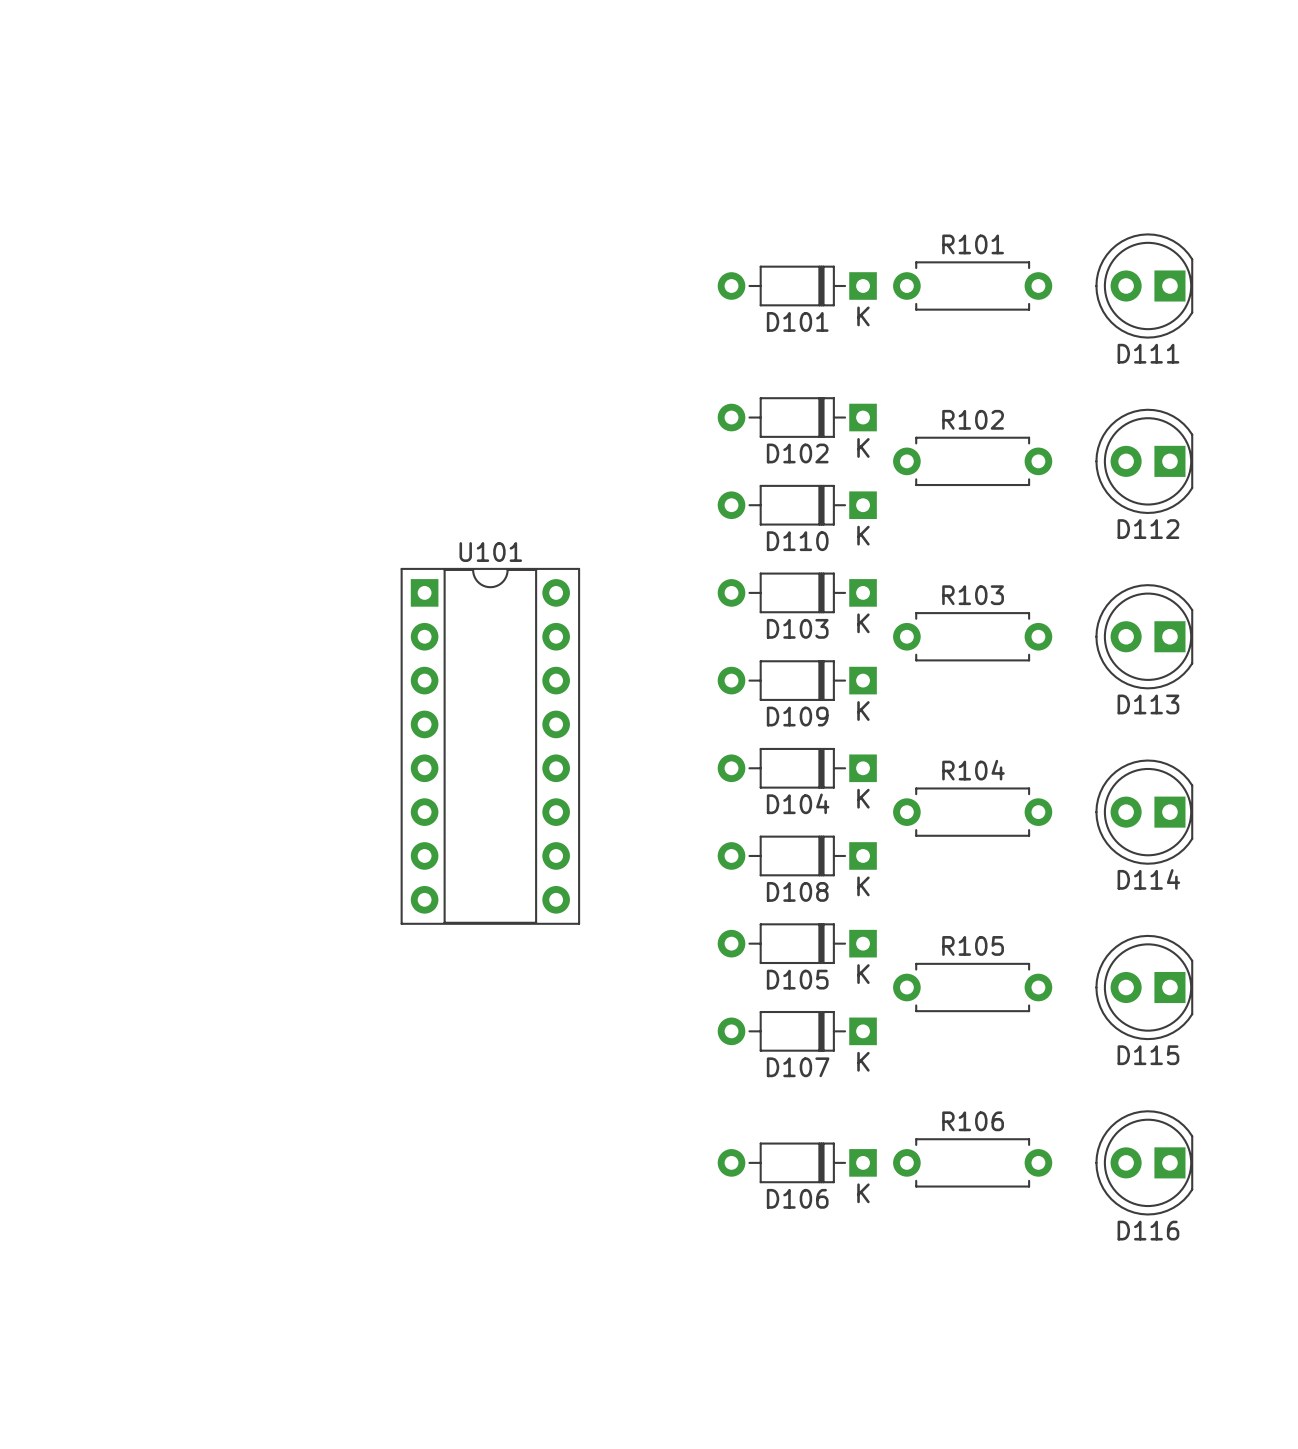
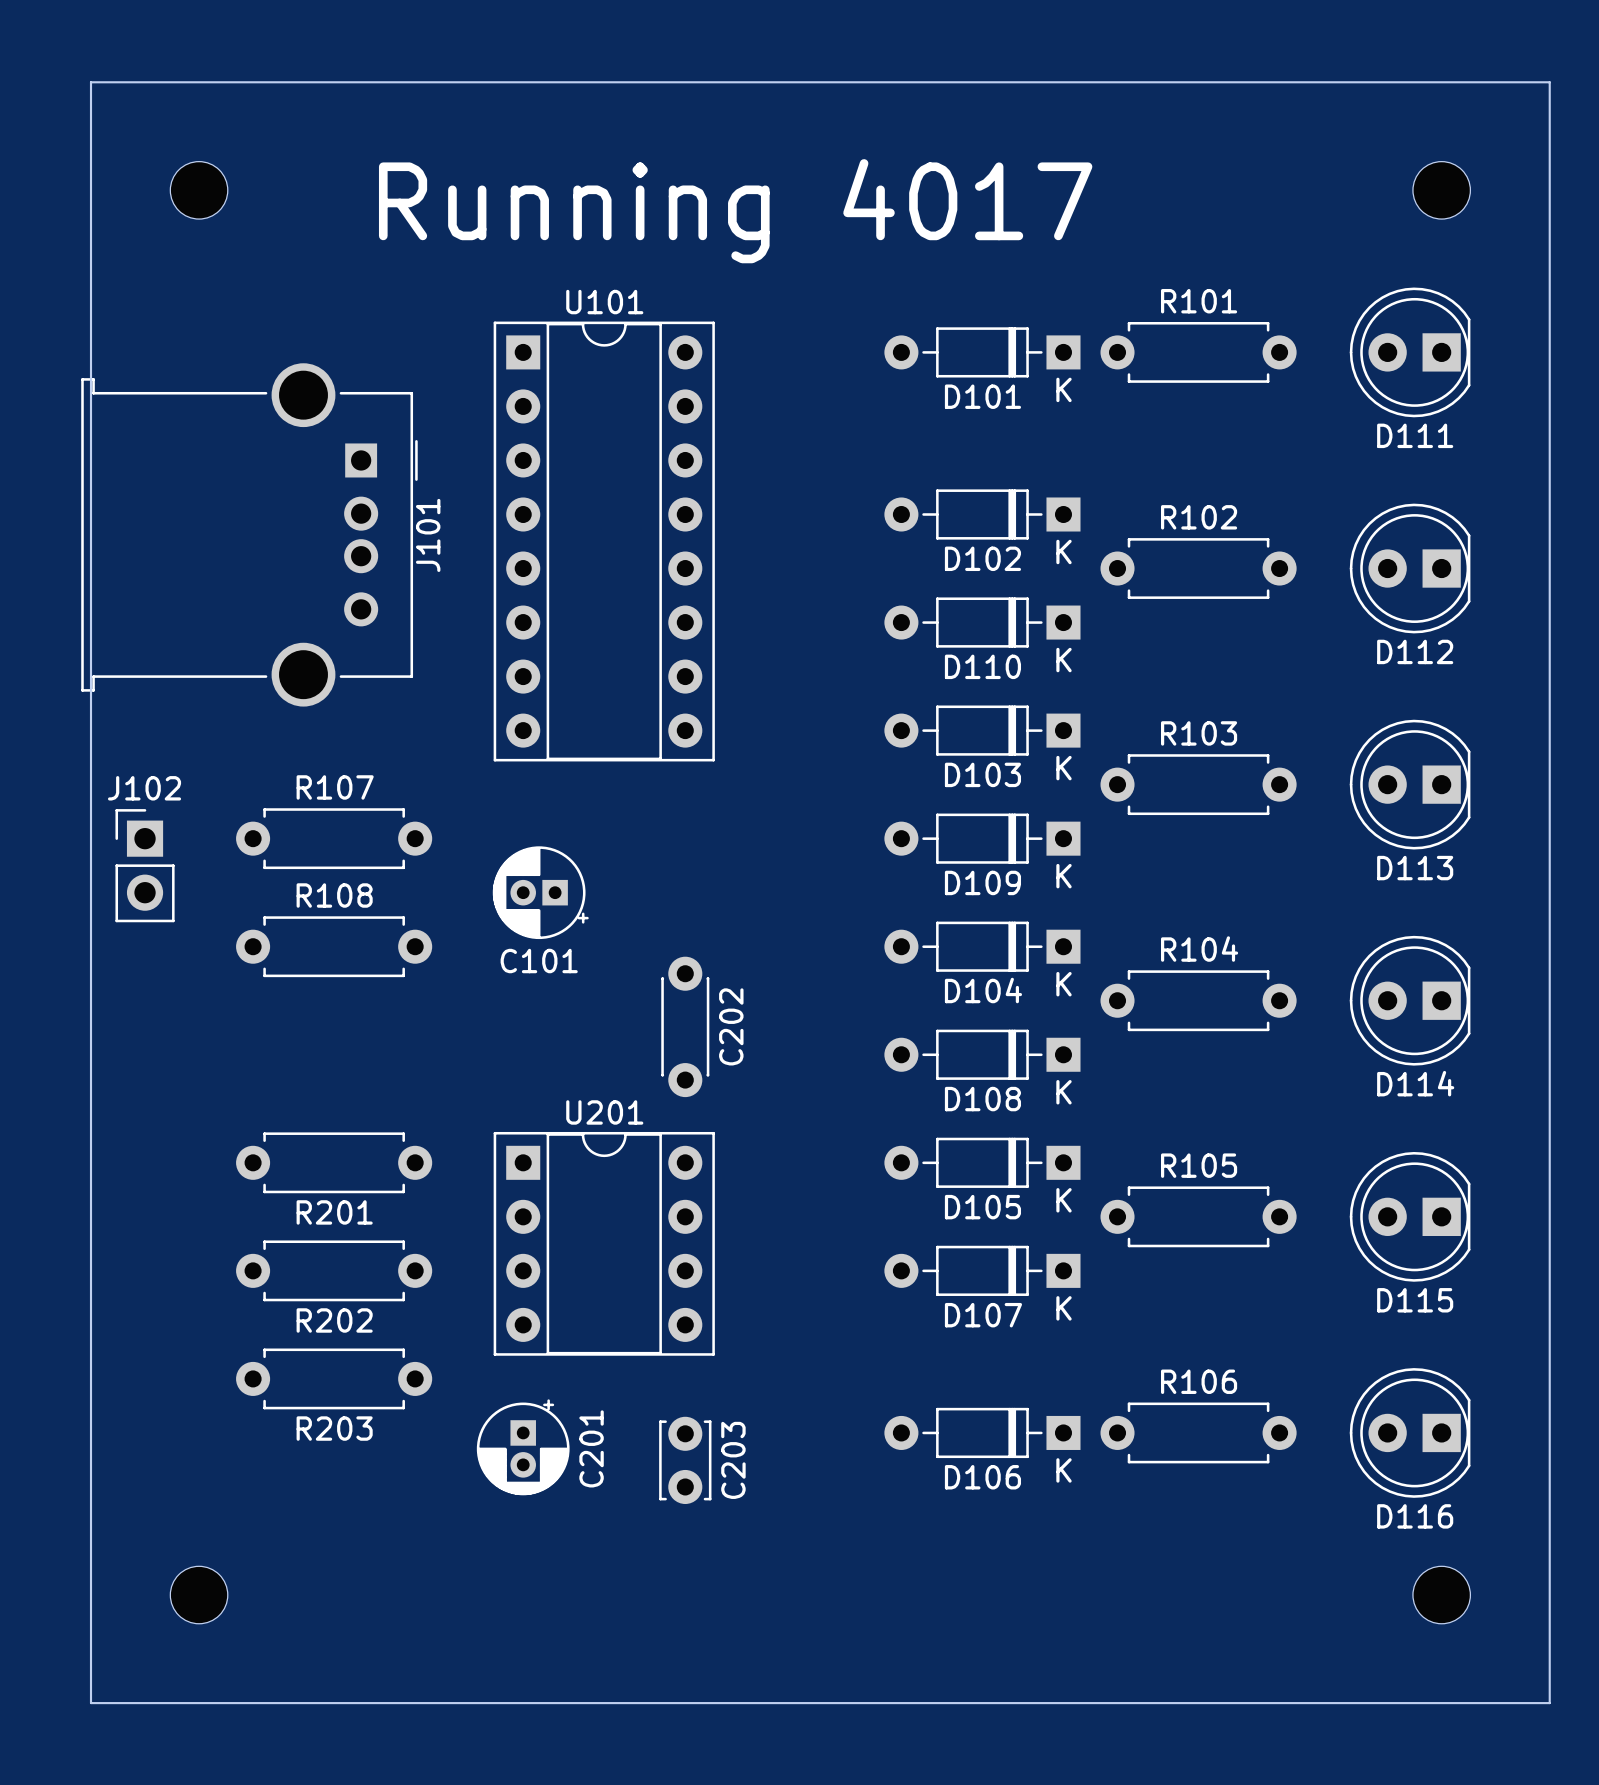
board edge: none -> (91, 82) (1549, 82) (1549, 1703) (91, 1703) (91, 82)
part: none -> (199, 190)
part: none -> (1441, 190)
text: none -> Running 4017 (735, 211)
J101: none -> (249, 534)
R107: none -> (334, 838)
J102: none -> (145, 865)
C101: none -> (540, 892)
U101 position: (490, 746) -> (604, 541)
R108: none -> (334, 946)
C202: none -> (685, 1026)
R201: none -> (334, 1162)
U201: none -> (604, 1243)
R202: none -> (334, 1270)
R203: none -> (334, 1378)
C201: none -> (523, 1447)
C203: none -> (685, 1460)
part: none -> (199, 1595)
part: none -> (1441, 1595)

